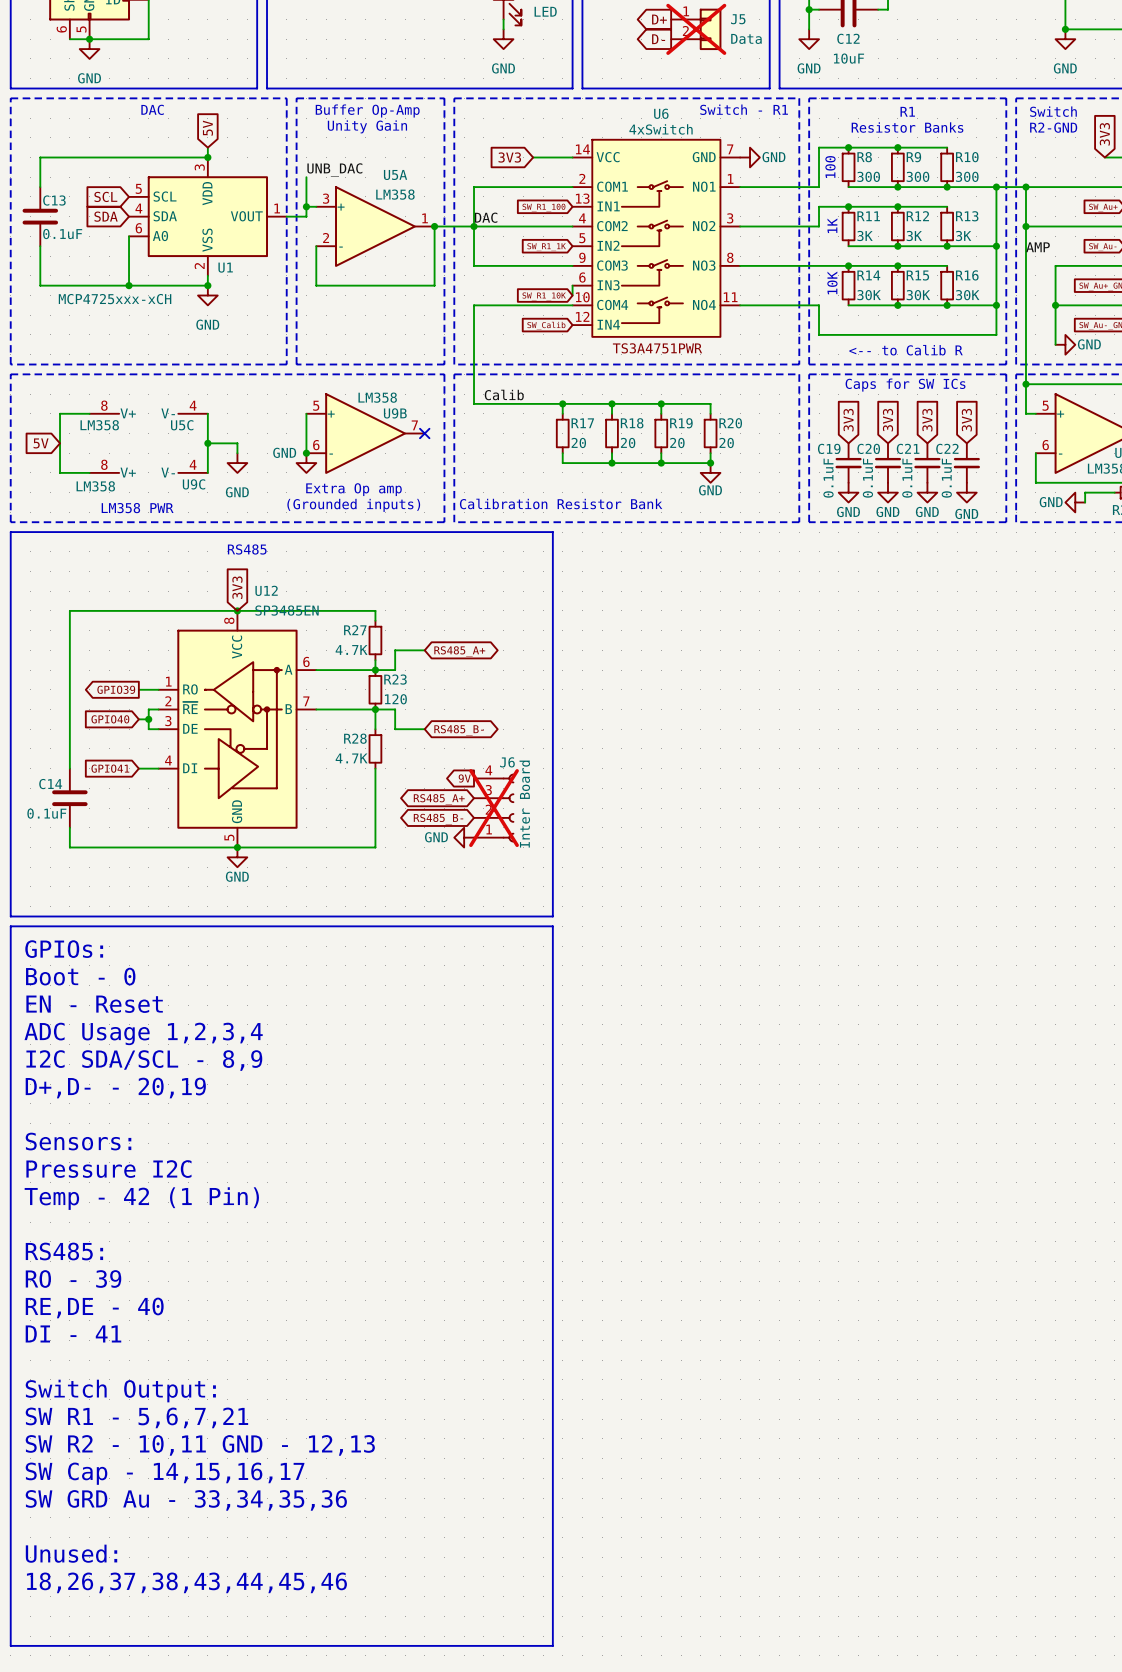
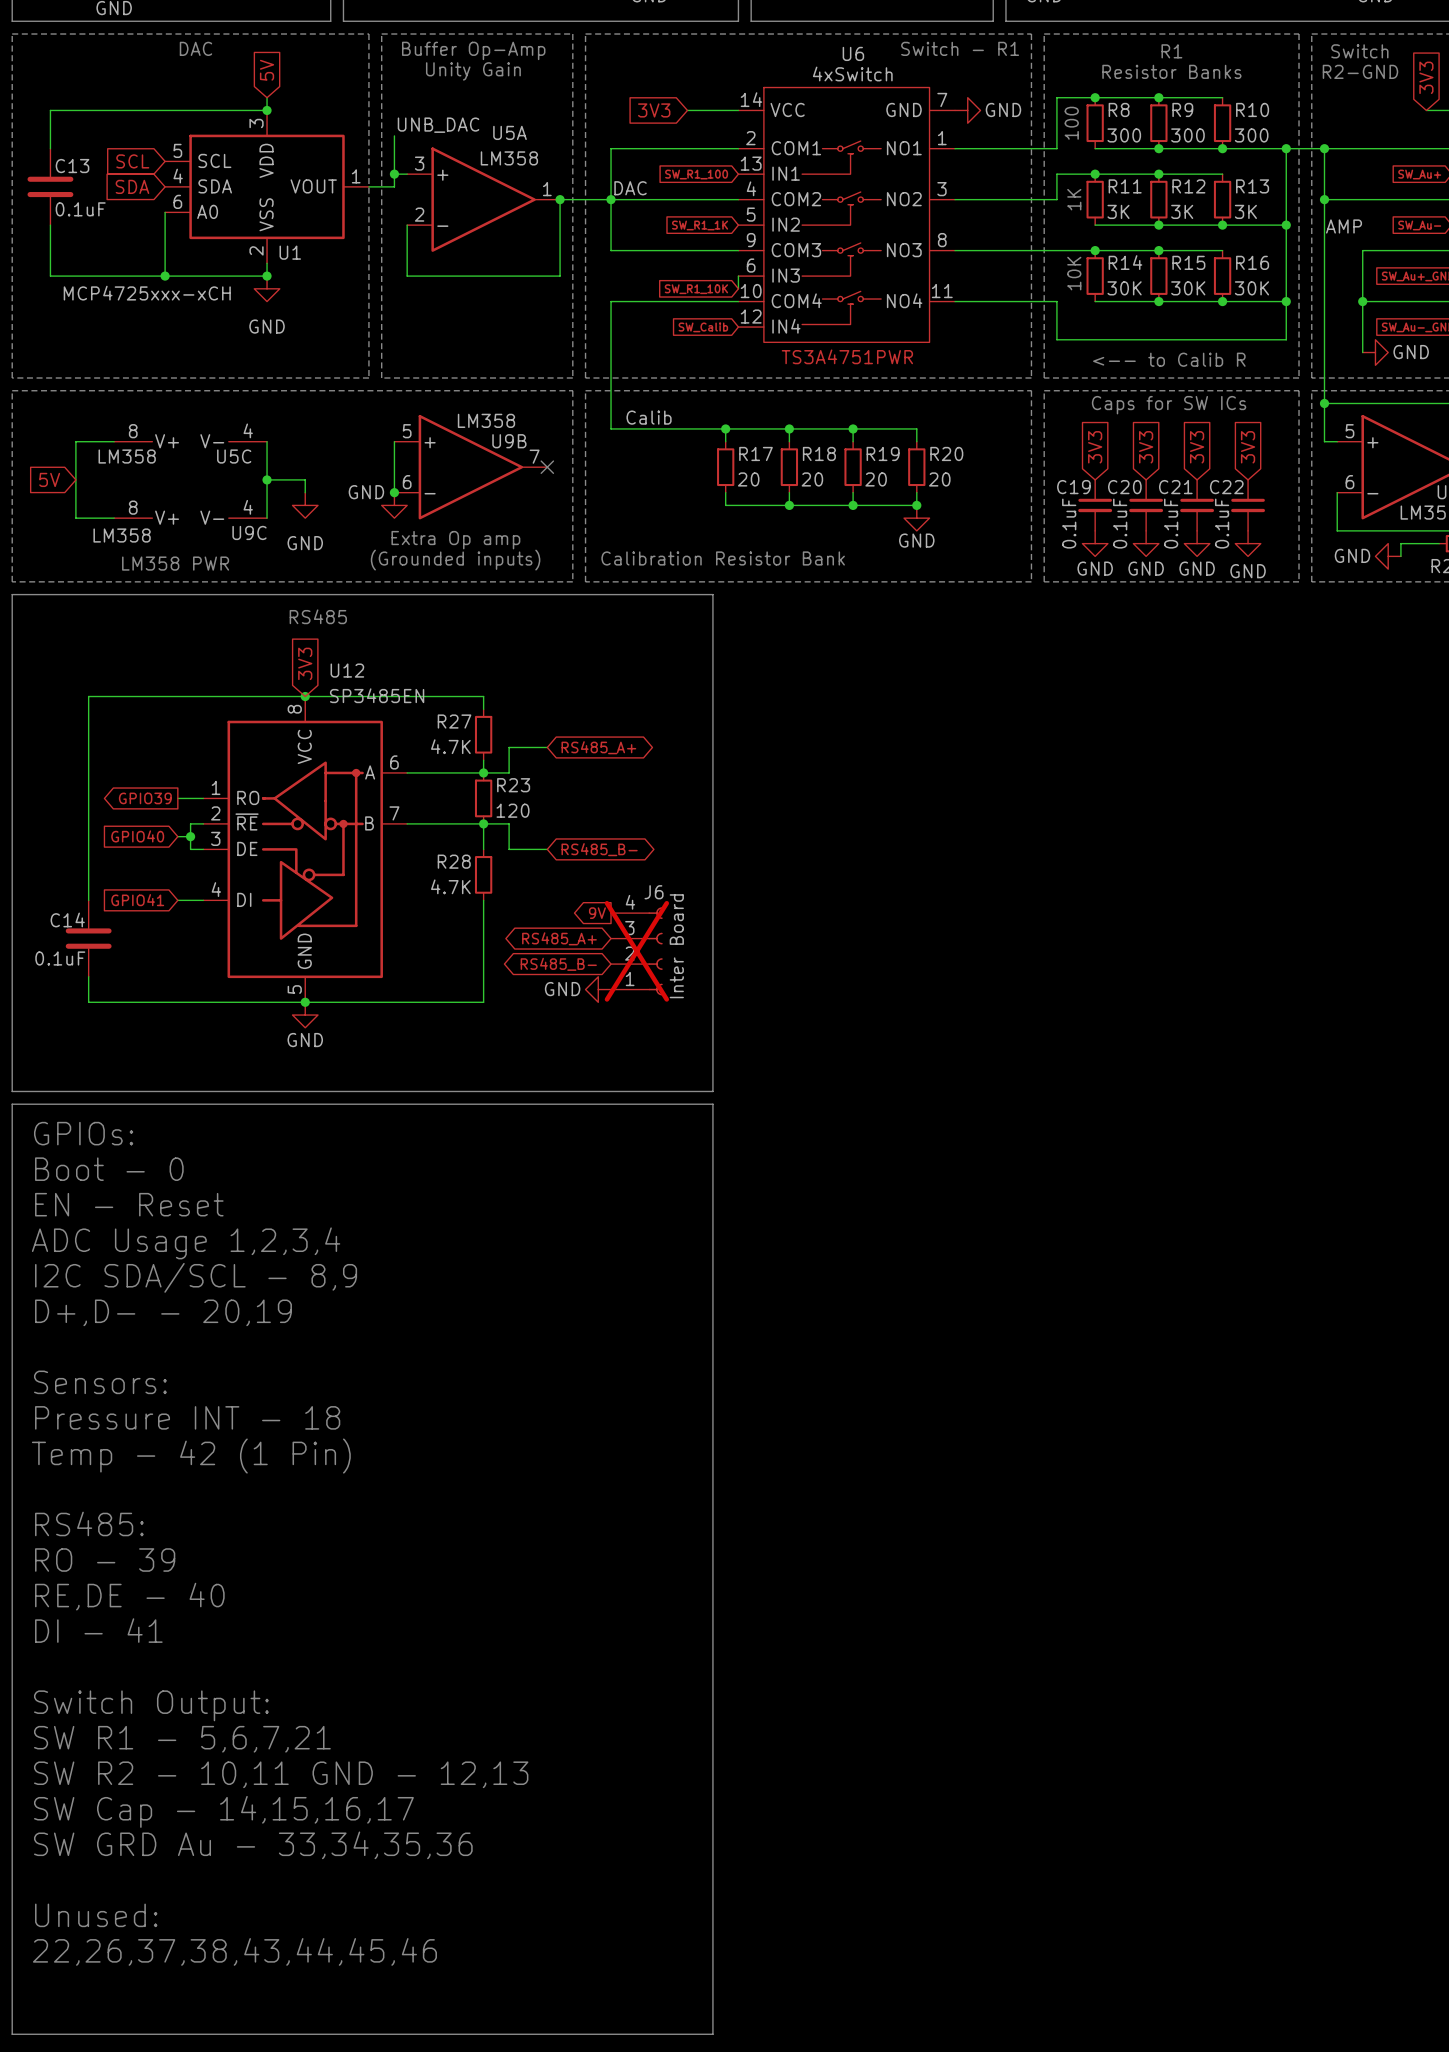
text: Pressure I2C (108, 1169) -> Pressure INT - 18 (187, 1417)
text: 18,26,37,38,43,44,45,46 (186, 1582) -> 22,26,37,38,43,44,45,46 (234, 1951)

